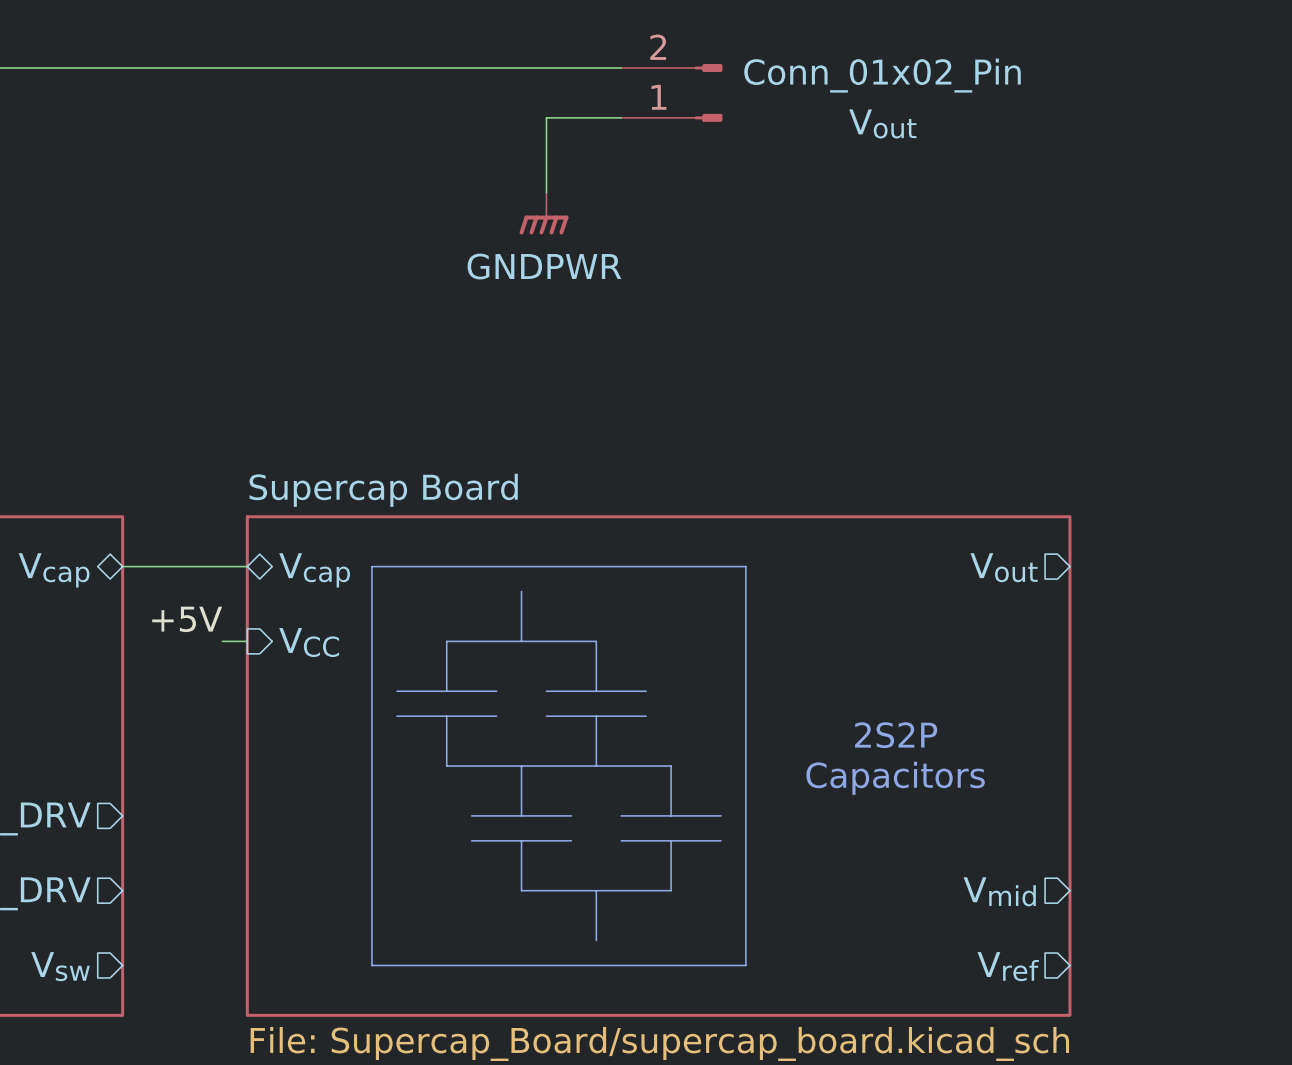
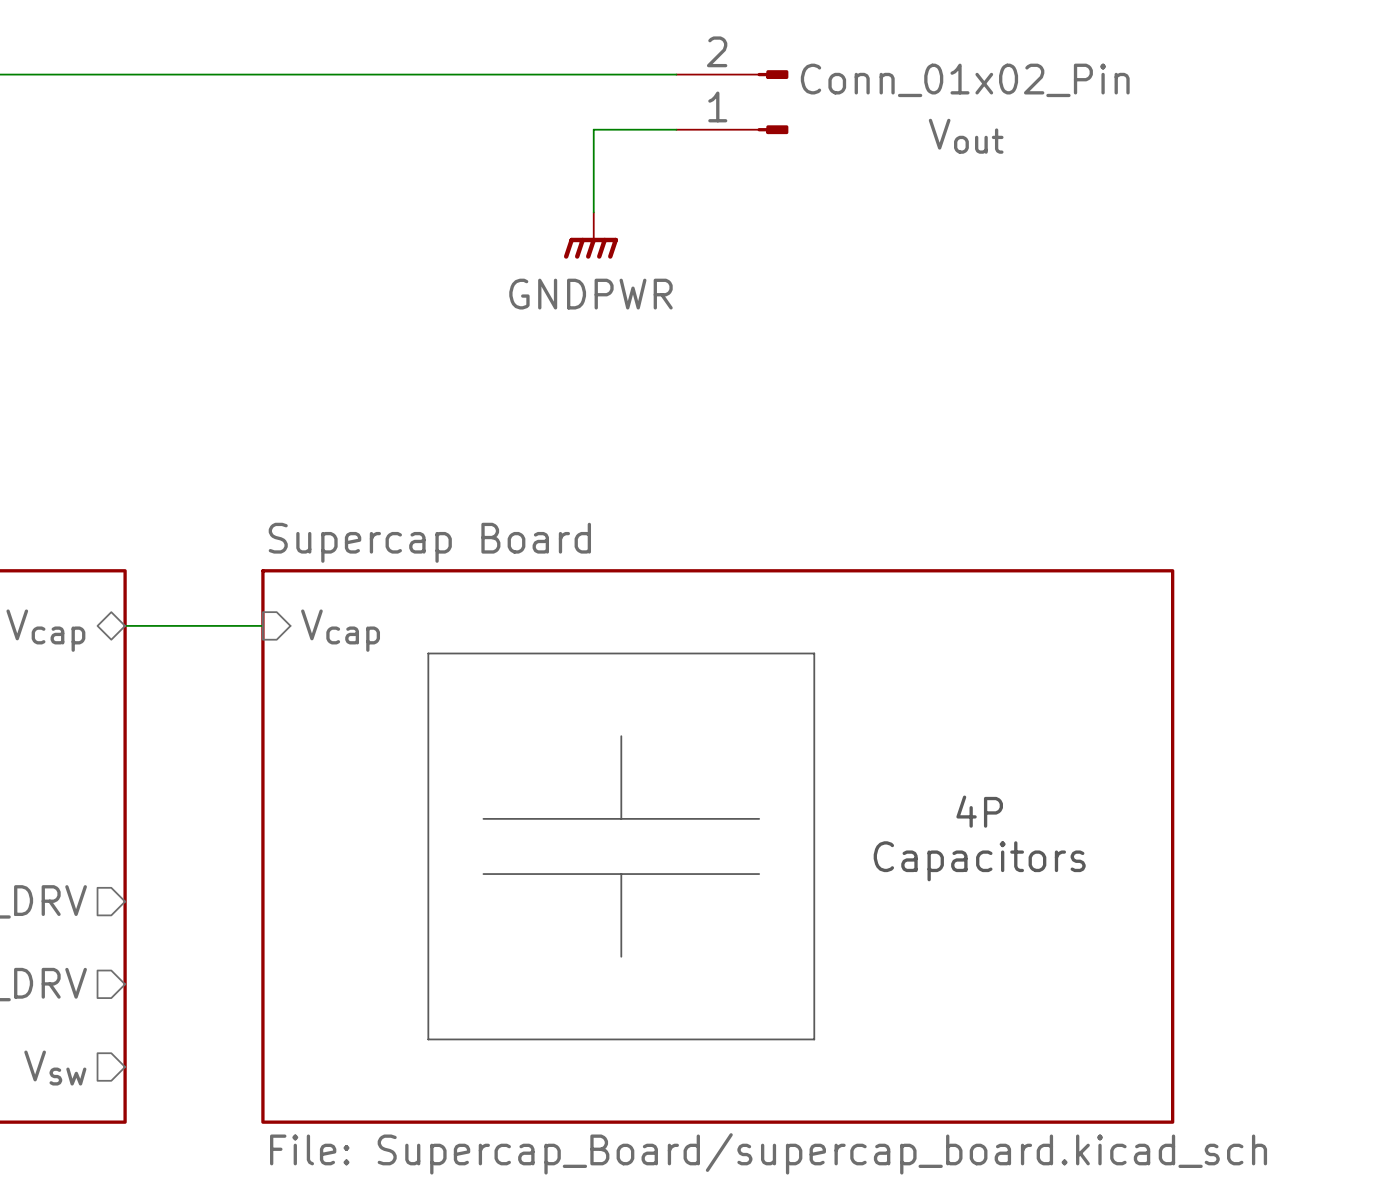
sheet pin: Vout (1004, 567) -> none
sheet pin shape: bidirectional (314, 570) -> input (340, 630)
line: (521, 591) (521, 641) -> none
line: (745, 591) (745, 566) (371, 566) (371, 965) (745, 965) (745, 940) -> (814, 653) (428, 653) (428, 1039) (814, 1039)
label: +5V (187, 619) -> none
wire: (222, 641) (247, 641) -> none
sheet pin: VCC (309, 642) -> none
line: none -> (621, 736) (621, 818)
line: (396, 691) (496, 691) -> none
line: (446, 691) (446, 641) (596, 641) (596, 691) -> none
line: (546, 691) (646, 691) -> none
line: (396, 716) (496, 716) -> none
line: (446, 716) (446, 766) (671, 766) (671, 815) -> none
line: (546, 716) (646, 716) -> none
line: (596, 716) (596, 766) -> none
text: 2S2P (896, 735) -> 4P (979, 811)
line: none -> (483, 818) (759, 818)
line: (521, 766) (521, 815) -> none
line: none -> (483, 874) (759, 874)
line: none -> (621, 874) (621, 956)
line: (471, 815) (571, 815) -> none
line: (621, 815) (720, 815) -> none
line: (471, 840) (571, 840) -> none
line: (521, 840) (521, 890) (671, 890) (671, 840) -> none
line: (621, 840) (720, 840) -> none
line: (596, 890) (596, 940) -> none
sheet pin: Vmid (999, 891) -> none
sheet pin: Vref (1008, 966) -> none

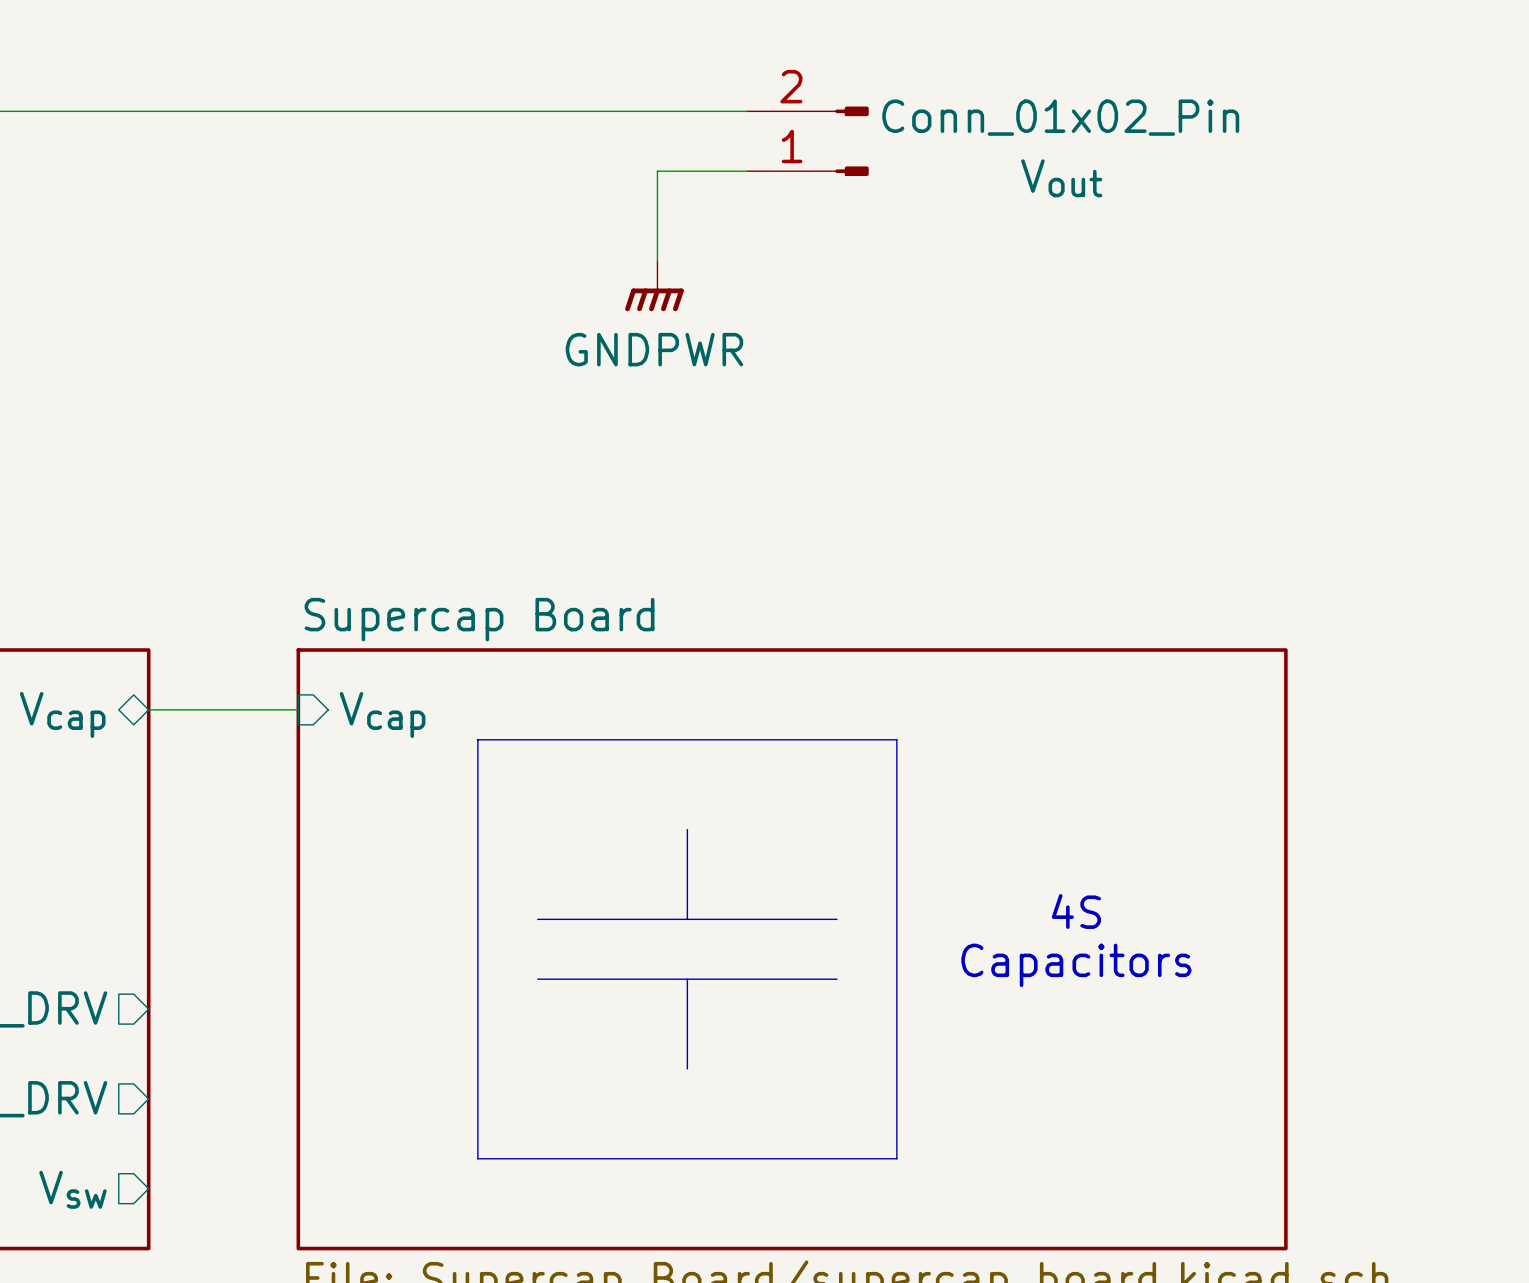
text: 4P (979, 811) -> 4S (1076, 911)

